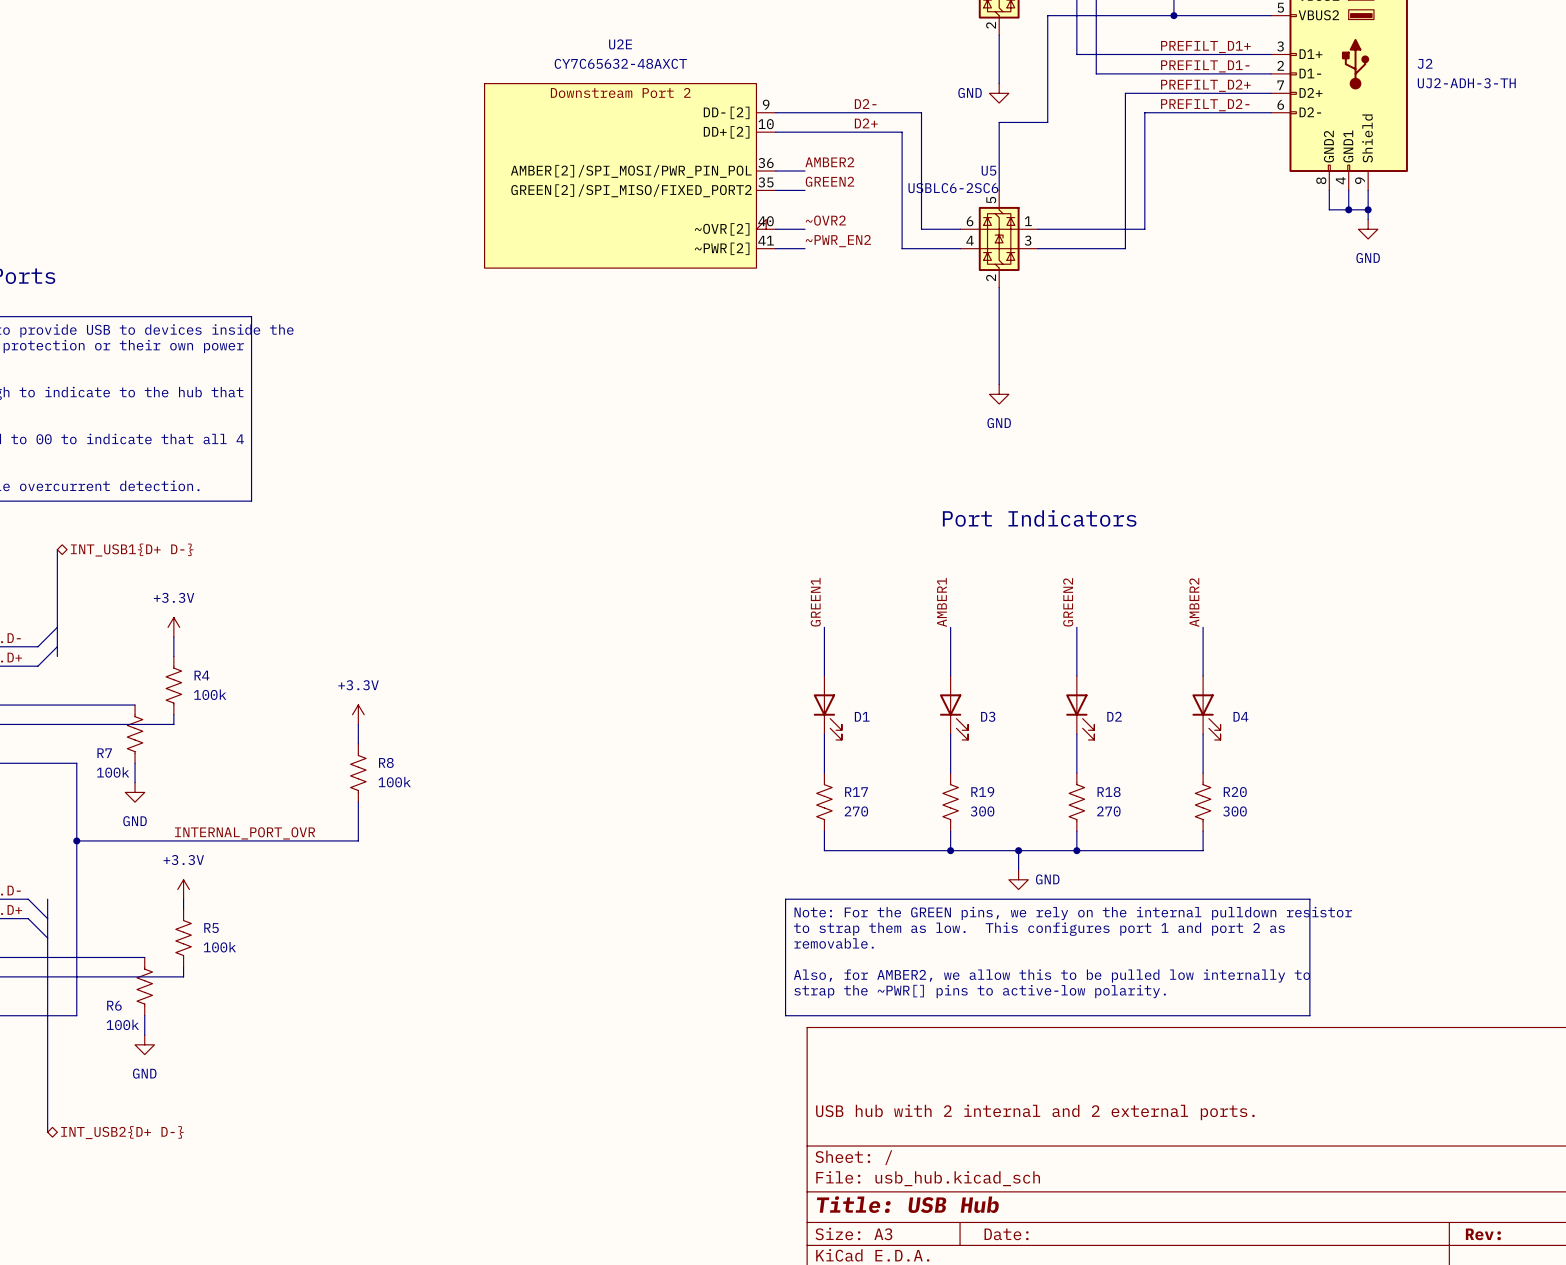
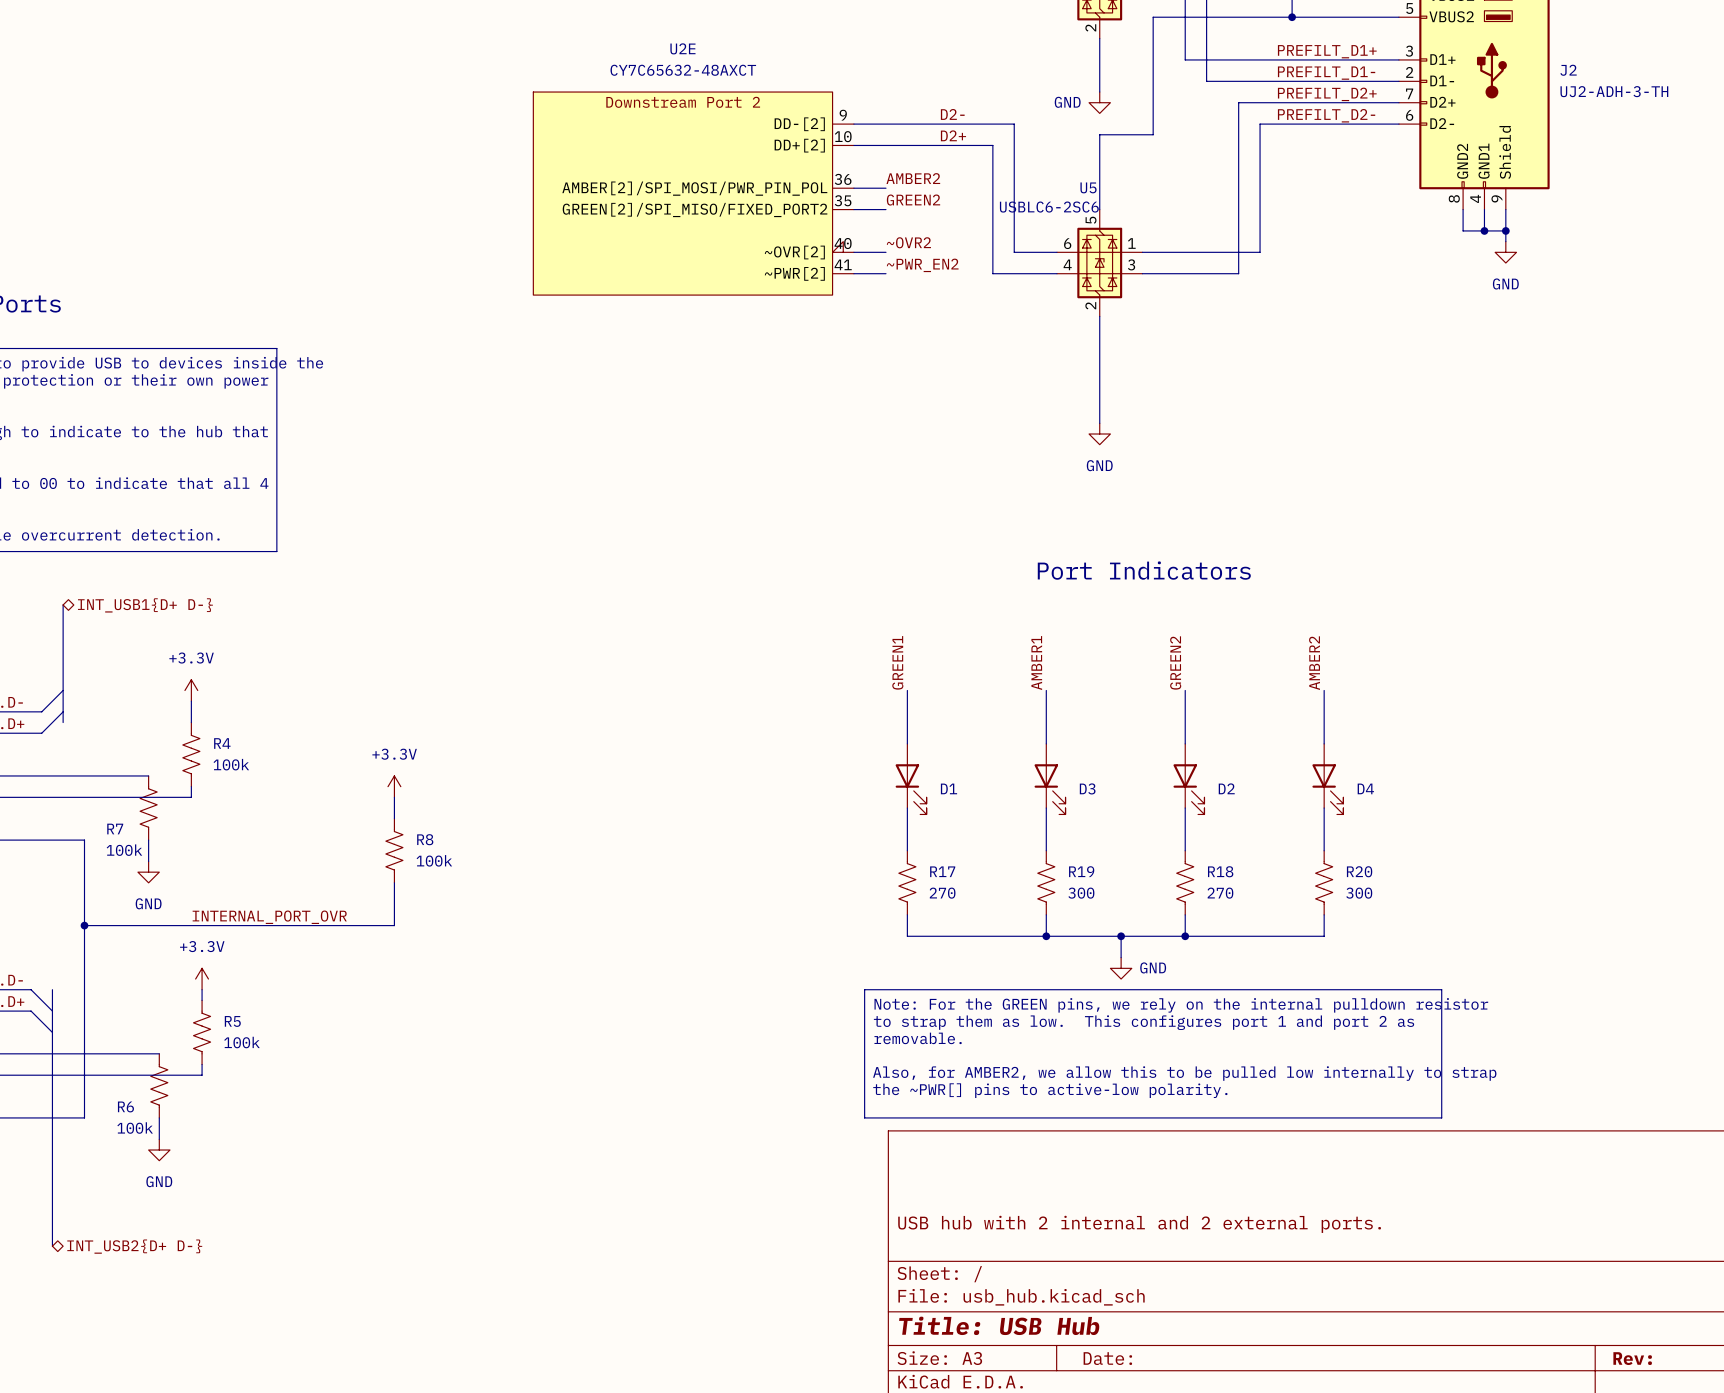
text: Also, for AMBER2, we allow this to be pulled low internally to (1051, 975) -> Also, for AMBER2, we allow this to be pulled low internally to strap (1184, 1073)
text: strap the ~PWR[] pins to active-low polarity. (980, 991) -> the ~PWR[] pins to active-low polarity. (1050, 1090)

